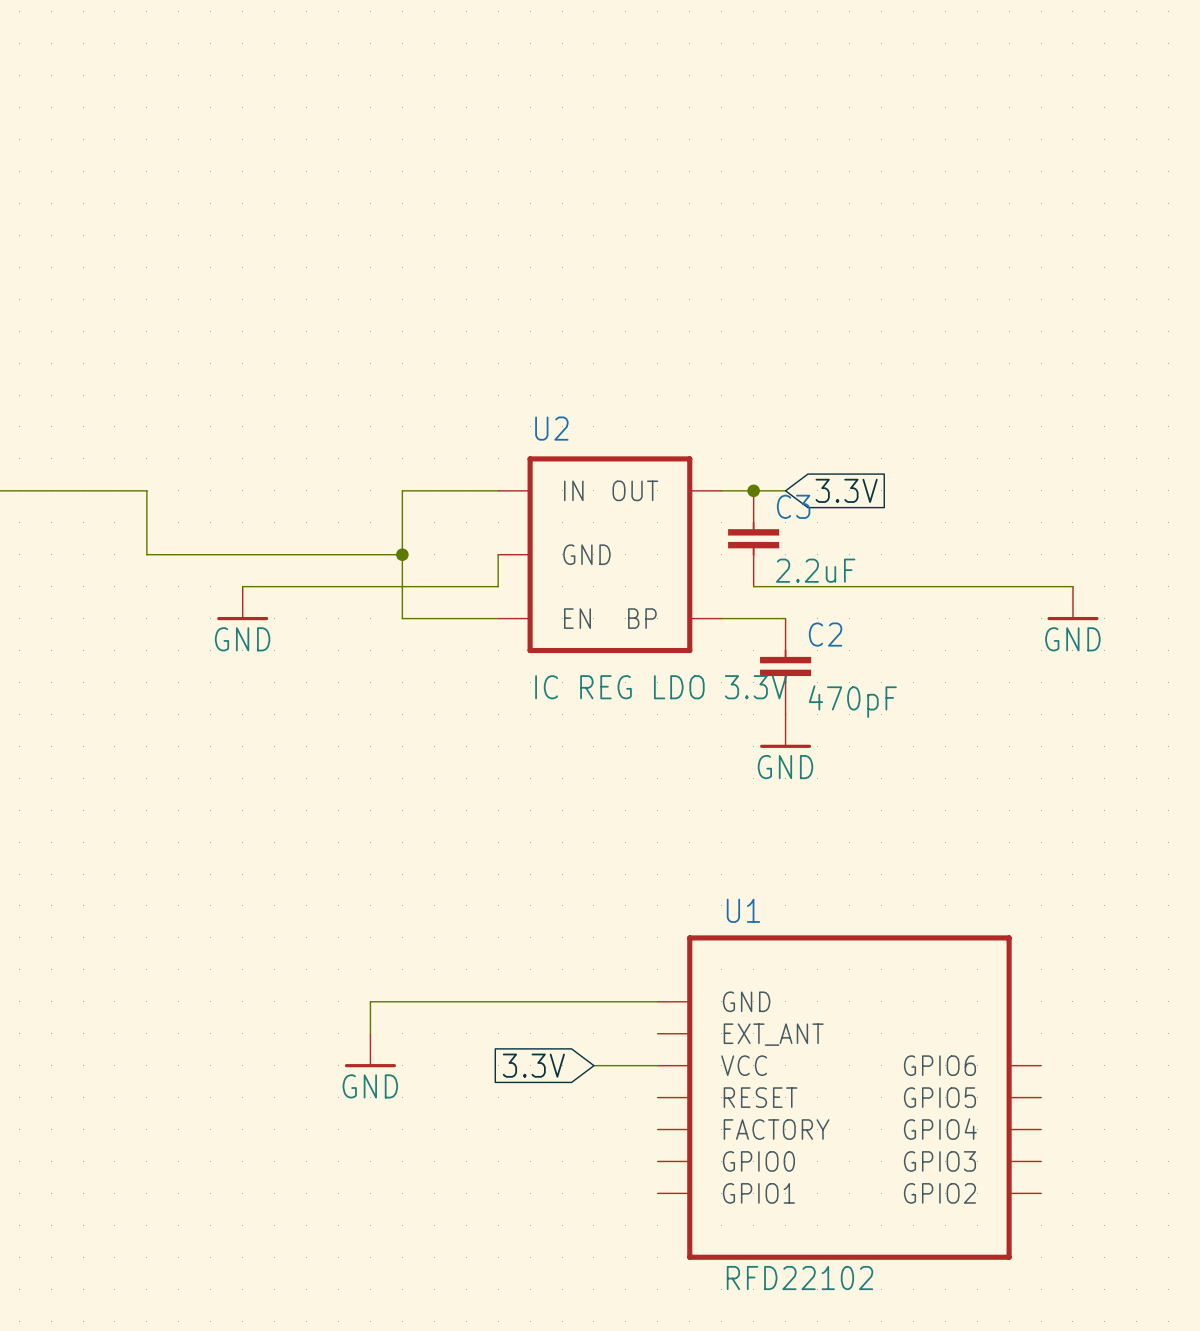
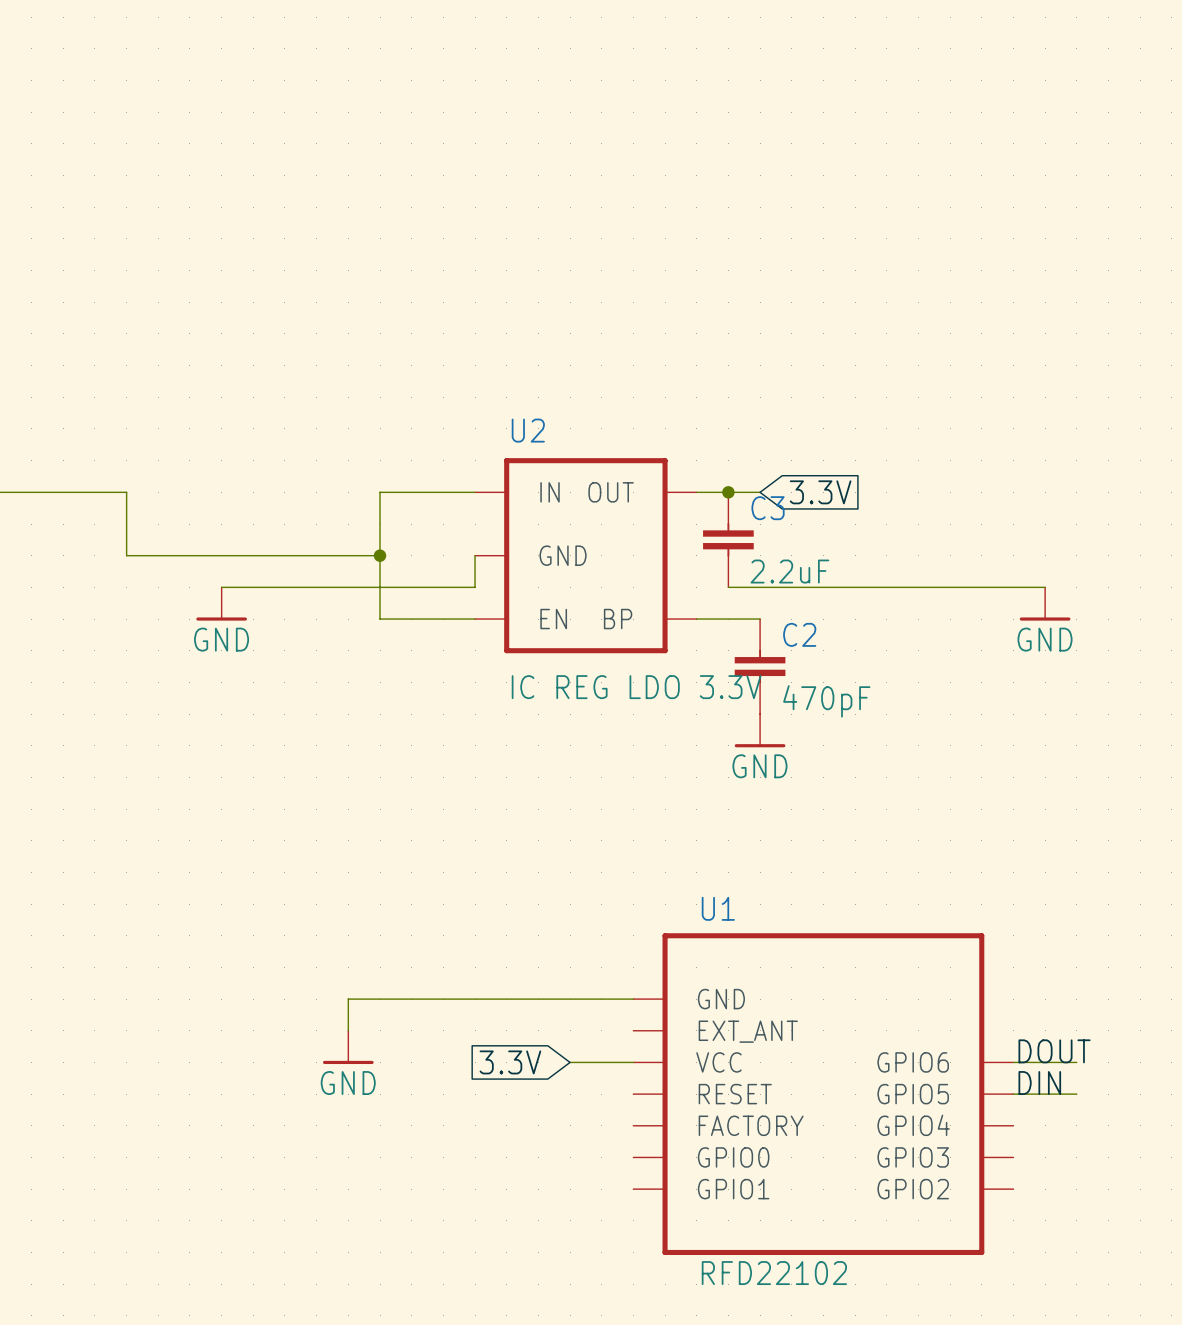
label: none -> DOUT (1054, 1051)
wire: none -> (1013, 1062) (1076, 1062)
label: none -> DIN (1039, 1083)
wire: none -> (1013, 1094) (1076, 1094)

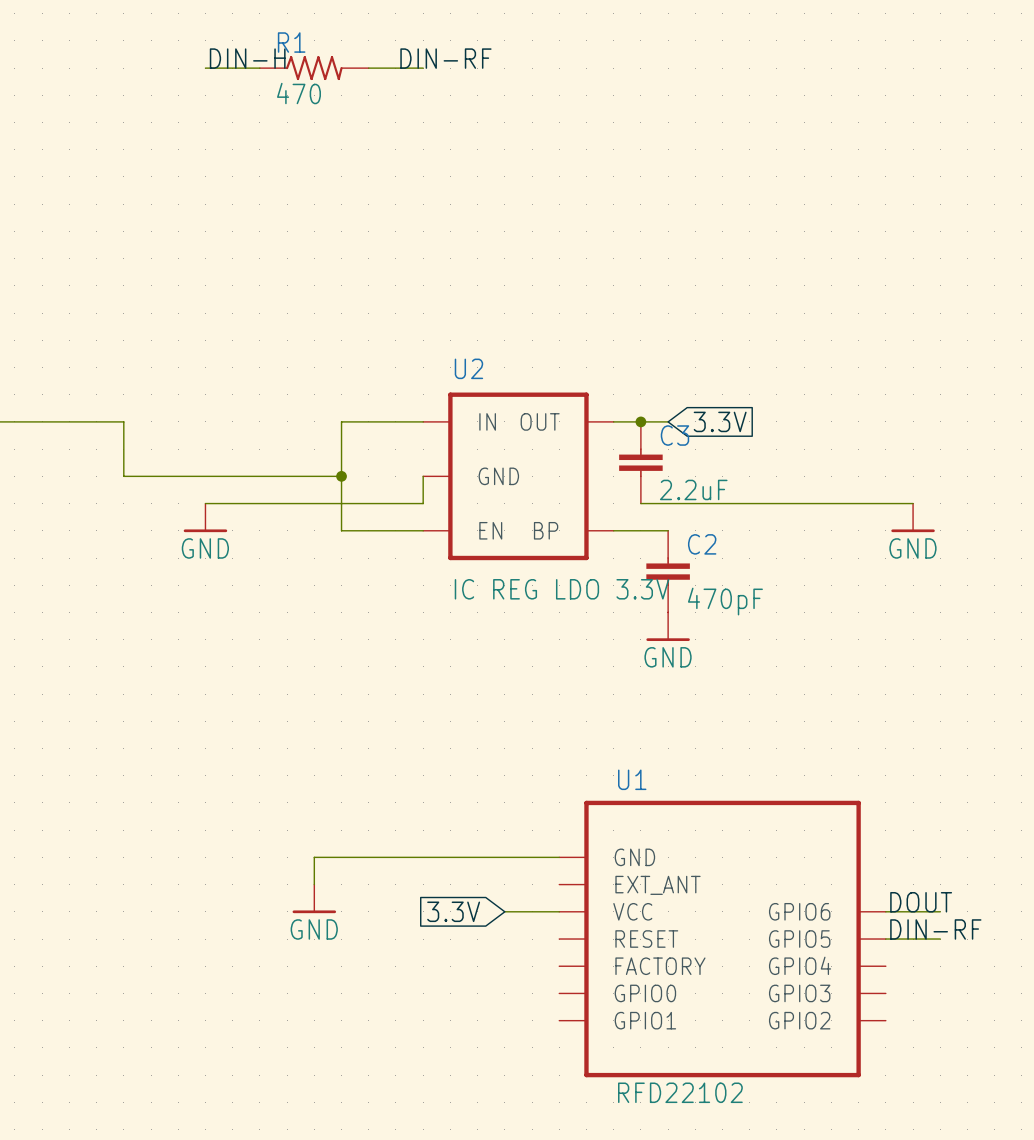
label: none -> DIN-H (247, 58)
label: none -> DIN-RF (445, 58)
wire: none -> (205, 68) (259, 68)
R1: none -> 470 (314, 68)
wire: none -> (368, 68) (423, 68)
label: DIN (1039, 1083) -> DIN-RF (935, 929)

